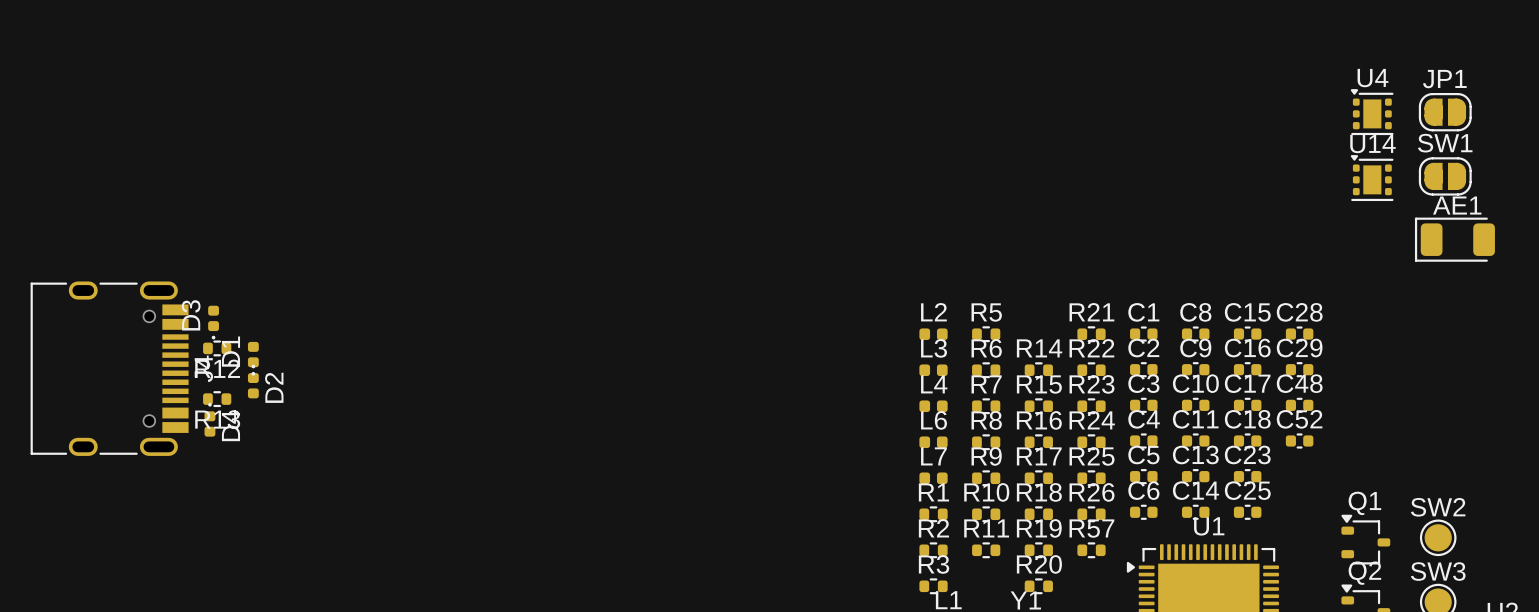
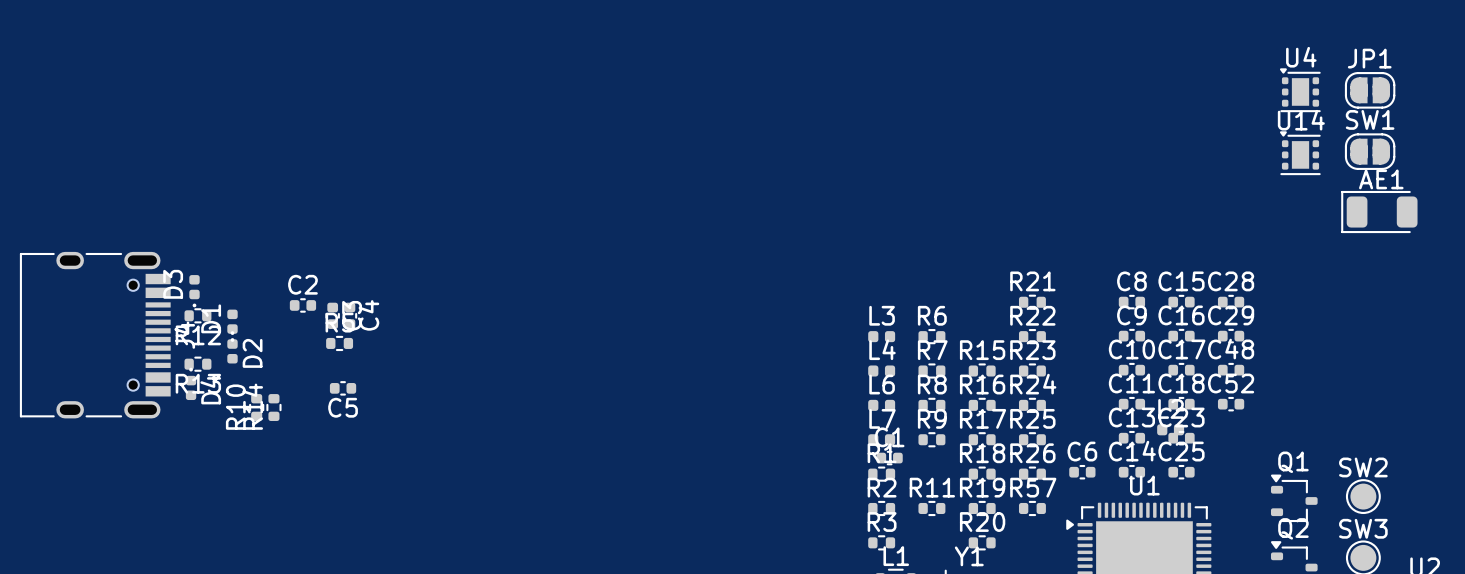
L2 position: (933, 334) -> (1170, 429)
R5 position: (986, 334) -> (339, 343)
C1 position: (1143, 334) -> (889, 458)
C2 position: (1143, 369) -> (302, 305)
R14 rotation: 0° (1038, 370) -> 90° clockwise (273, 407)
R14 position: (1038, 370) -> (273, 407)
C3 rotation: 0° (1143, 405) -> 90° clockwise (332, 315)
C3 position: (1143, 405) -> (332, 315)
C4 rotation: 0° (1143, 440) -> 90° clockwise (349, 315)
C4 position: (1143, 440) -> (349, 315)
C5 name position: C5 (1143, 454) -> C5 (343, 407)
C5 position: (1143, 476) -> (343, 388)
R10 rotation: 0° (986, 514) -> 90° clockwise (256, 407)
R10 position: (986, 514) -> (256, 407)

